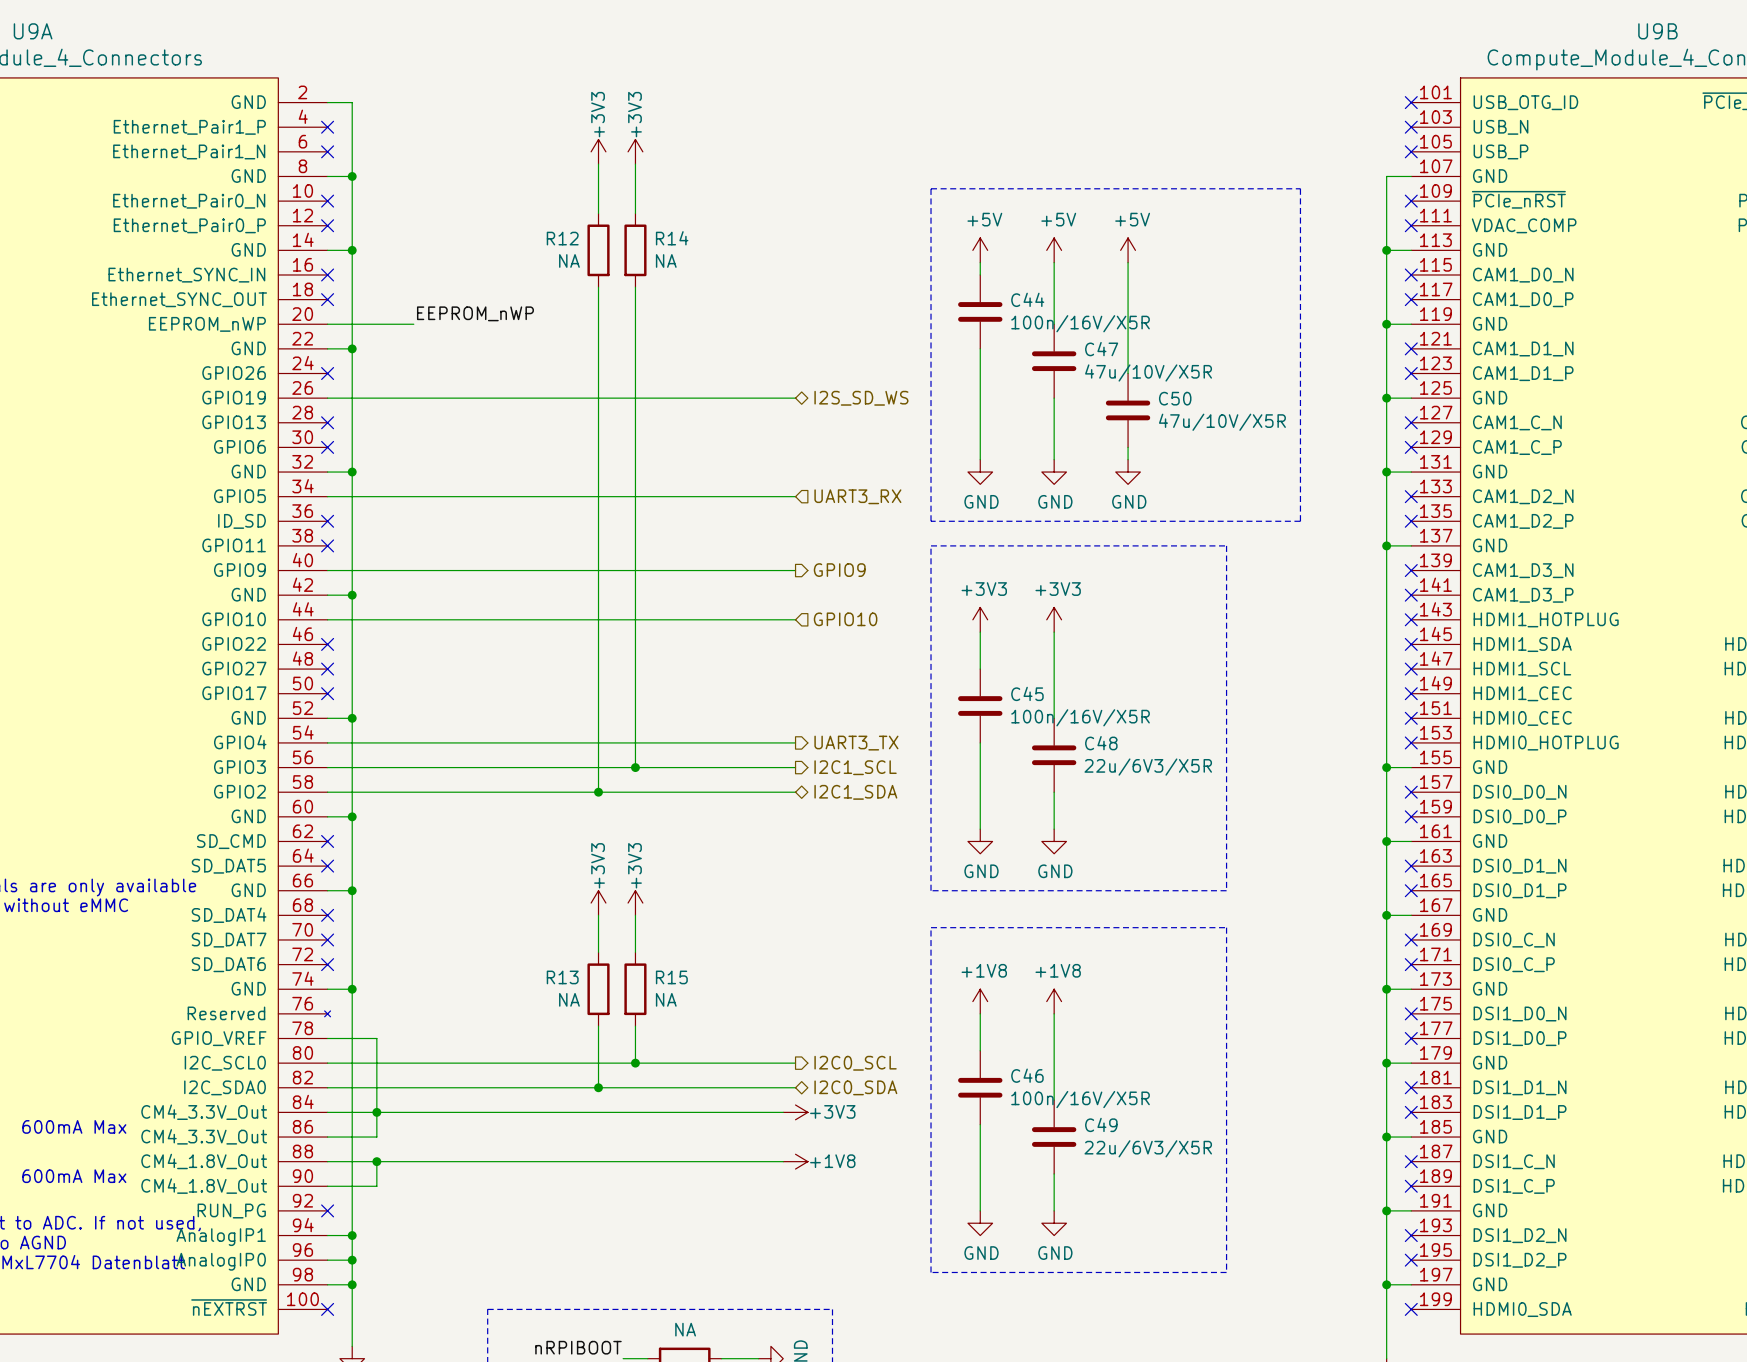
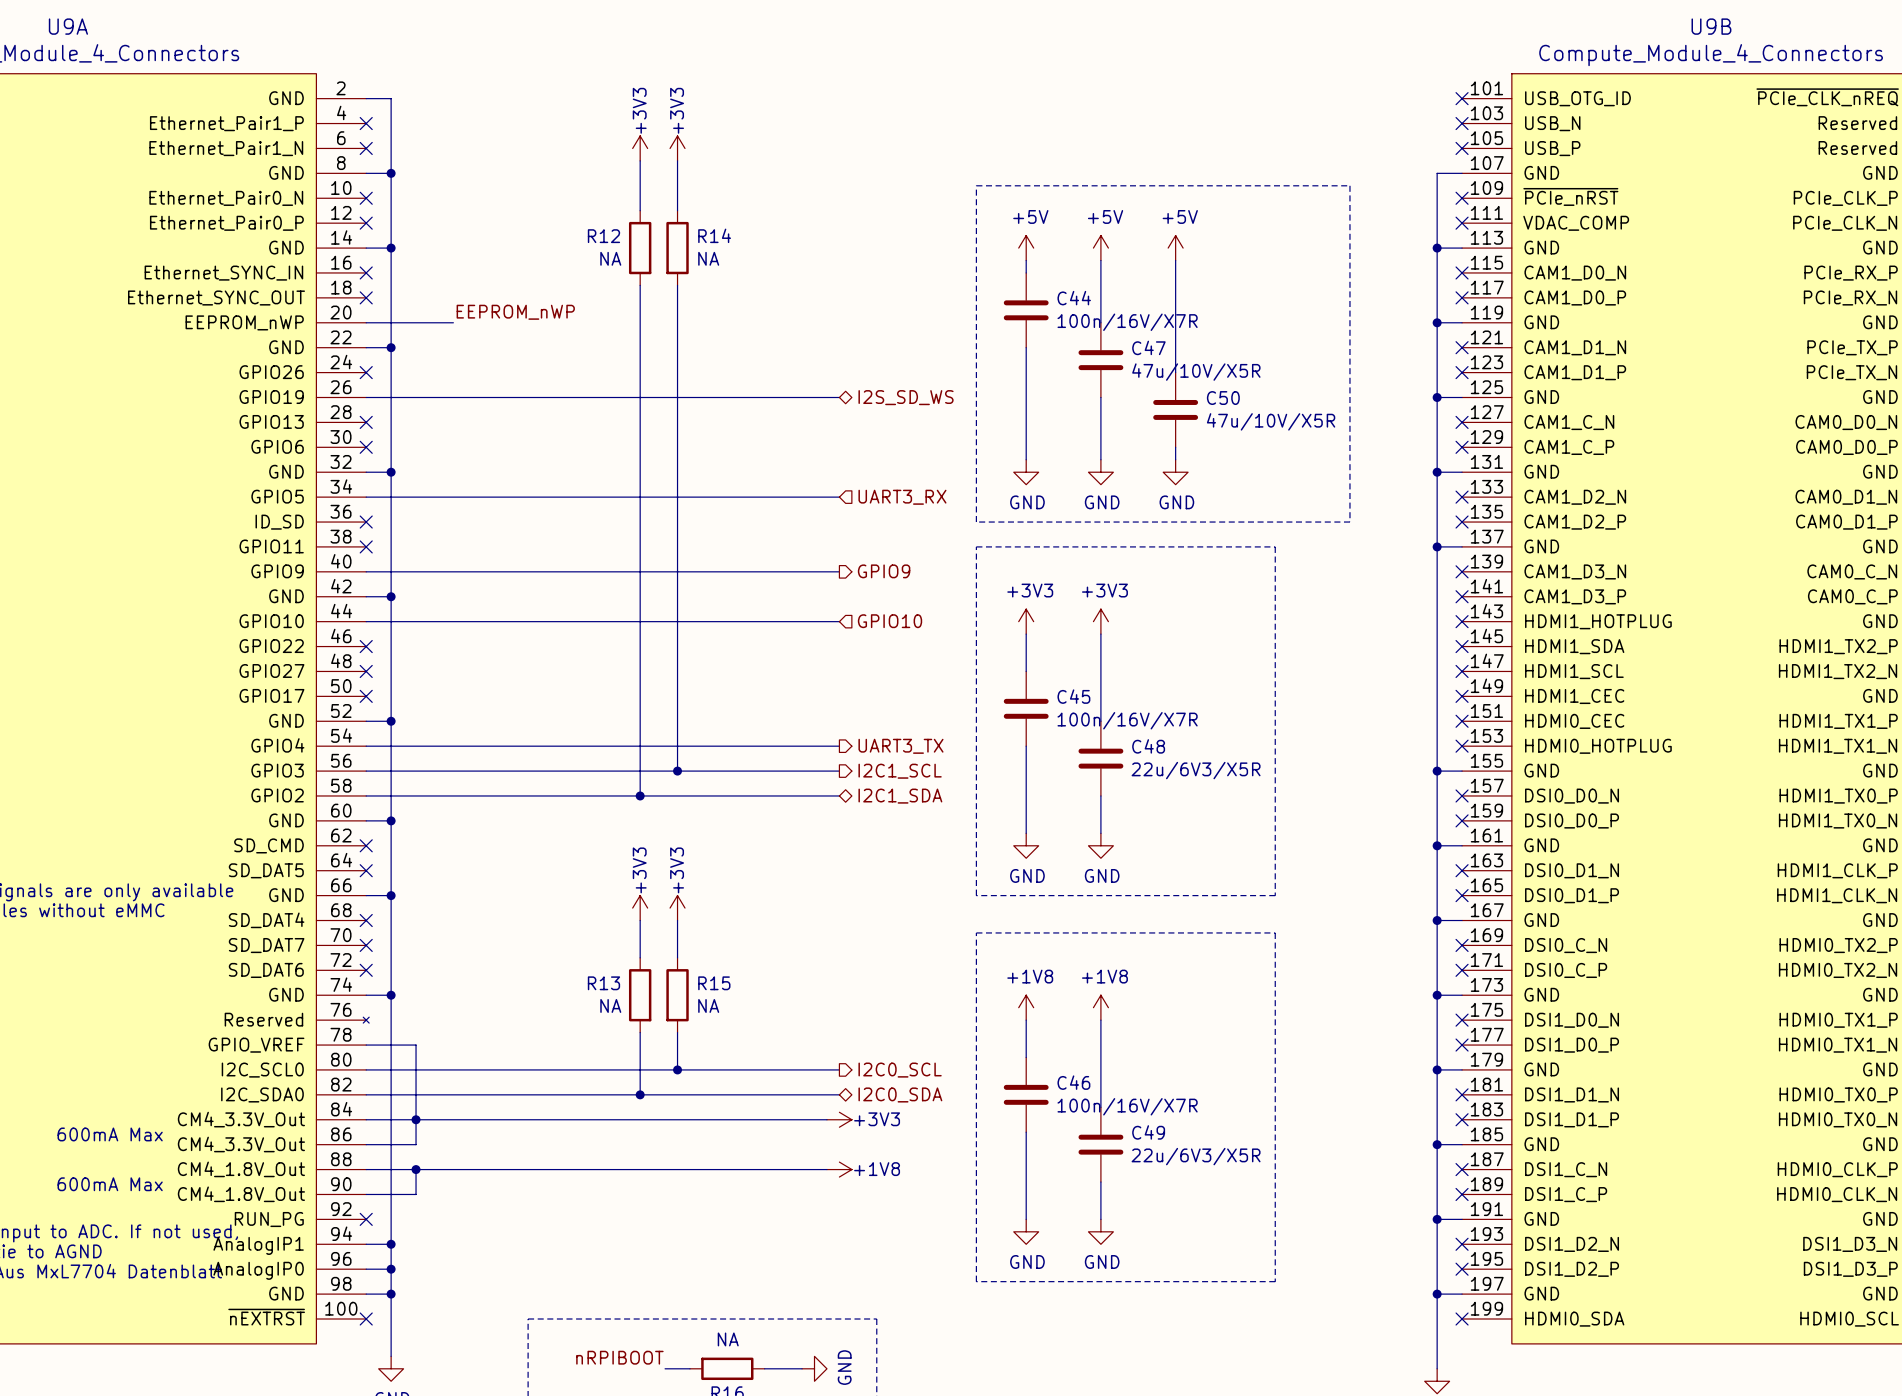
C44 value: 100n/16V/X5R (1080, 323) -> 100n/16V/X7R (1127, 322)
C45 value: 100n/16V/X5R (1080, 717) -> 100n/16V/X7R (1127, 720)
C46 value: 100n/16V/X5R (1080, 1099) -> 100n/16V/X7R (1127, 1106)

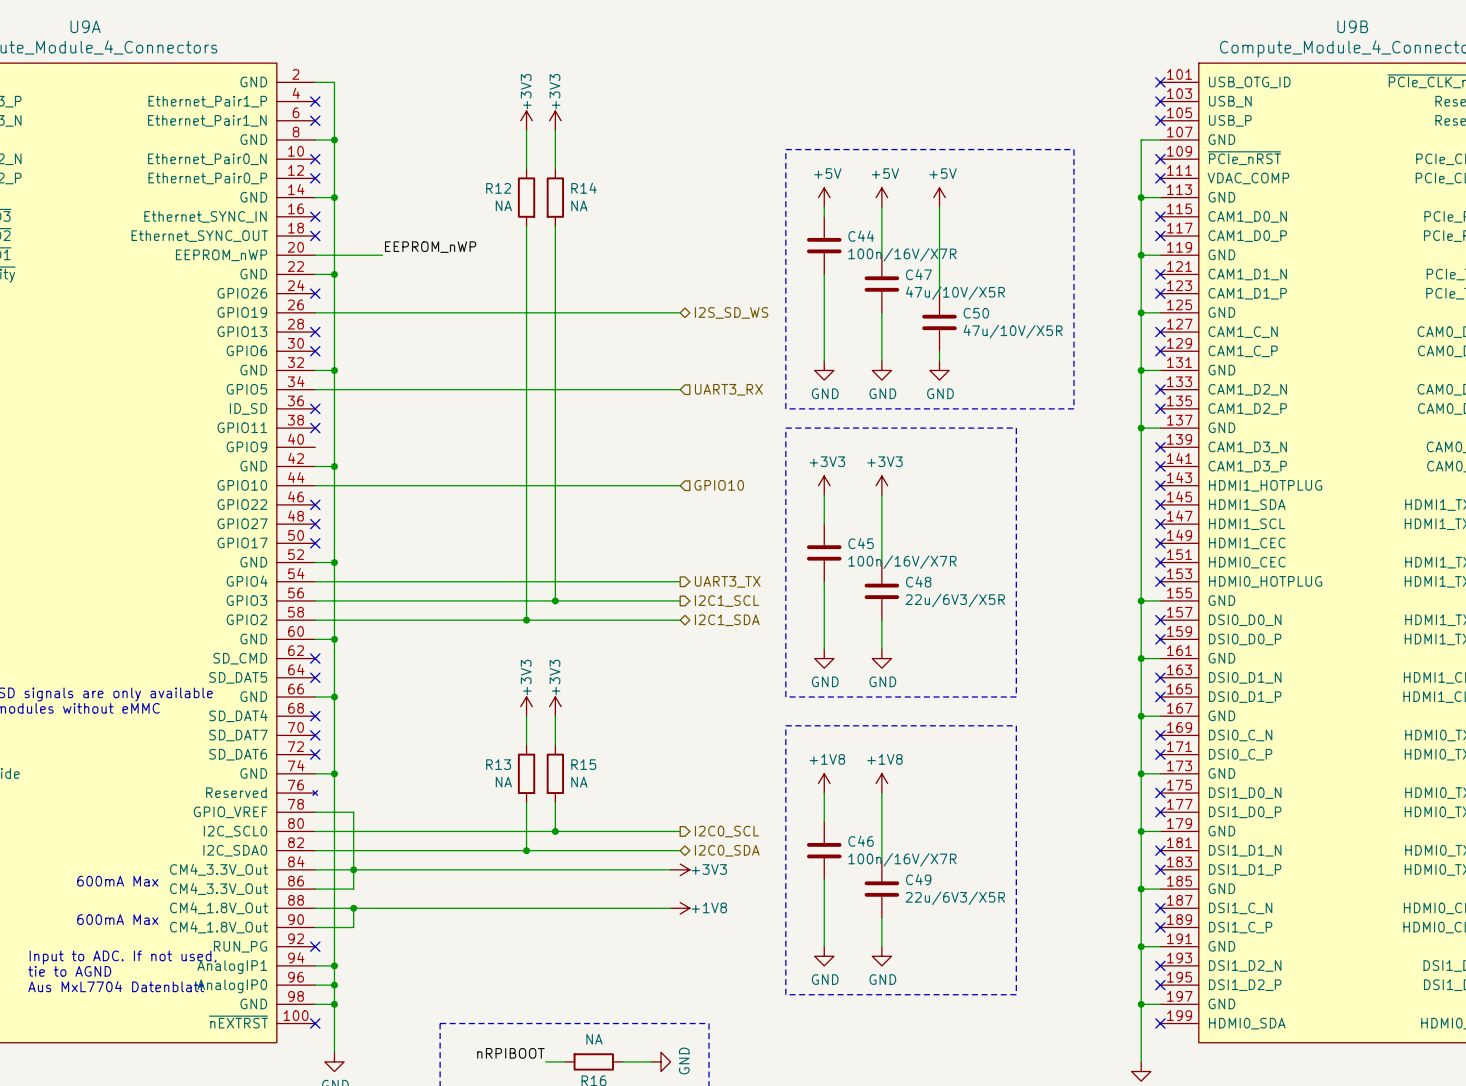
wire: (366, 571) (839, 571) -> none
hierarchical label: GPIO9 (884, 571) -> none

